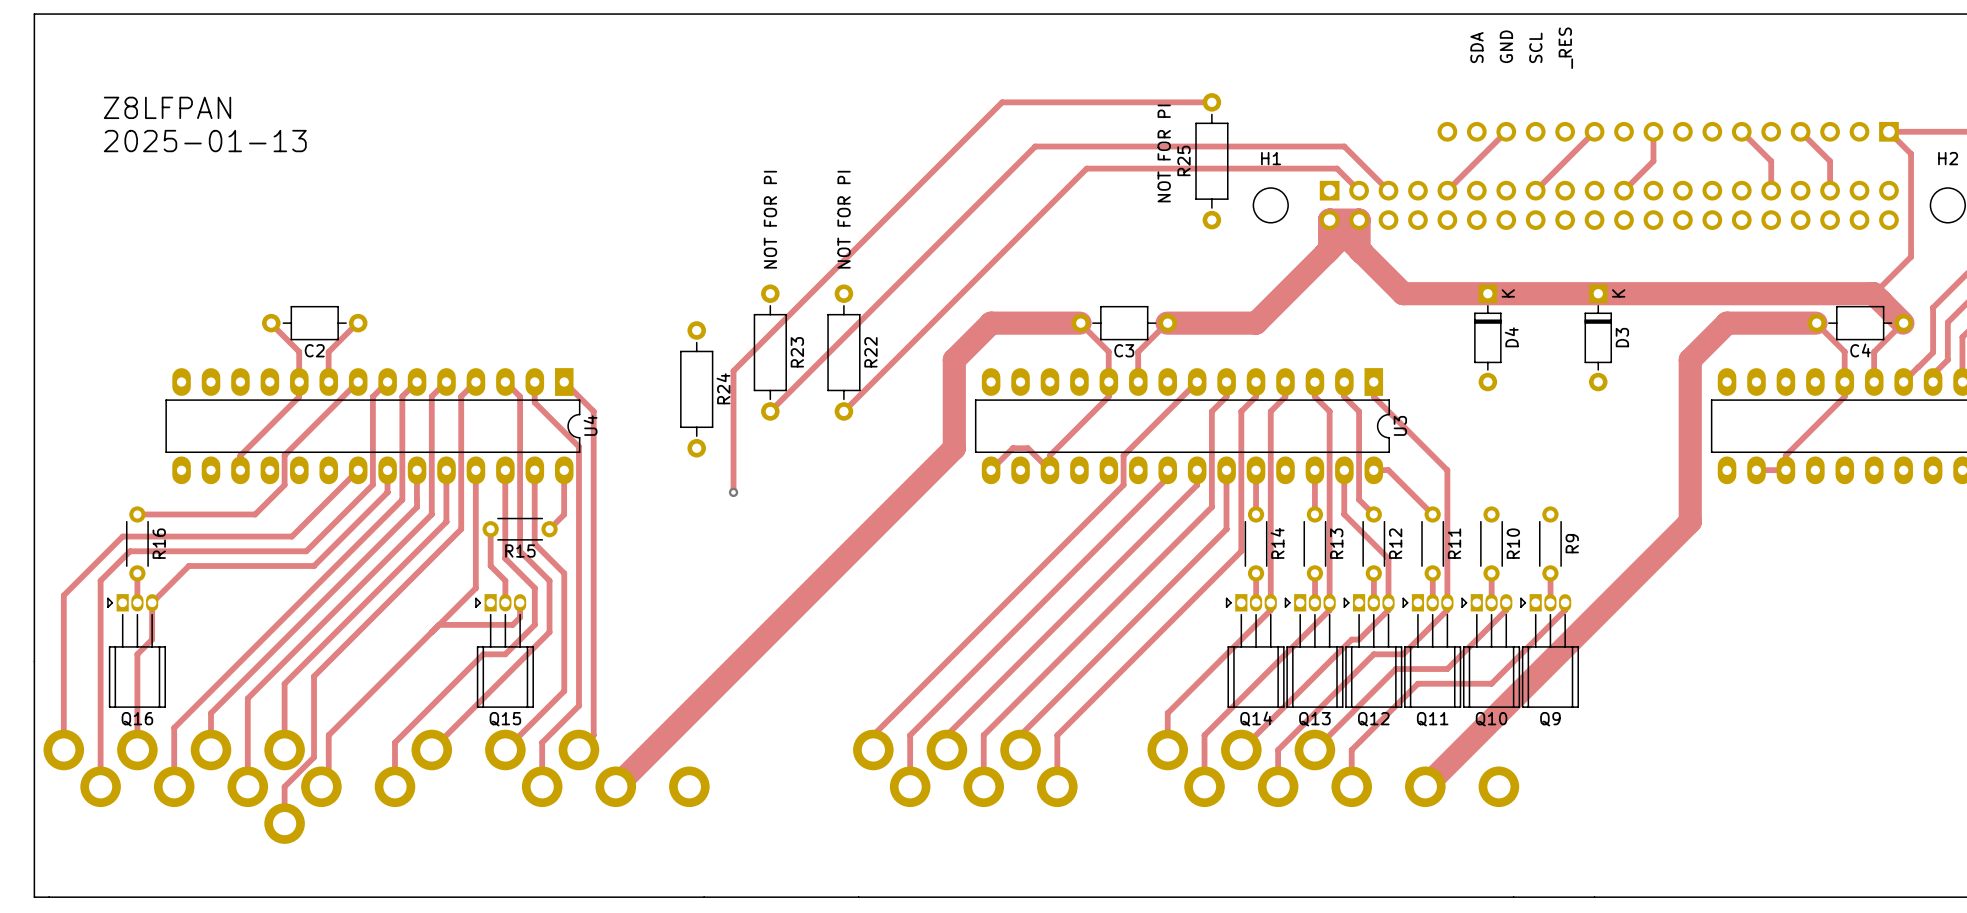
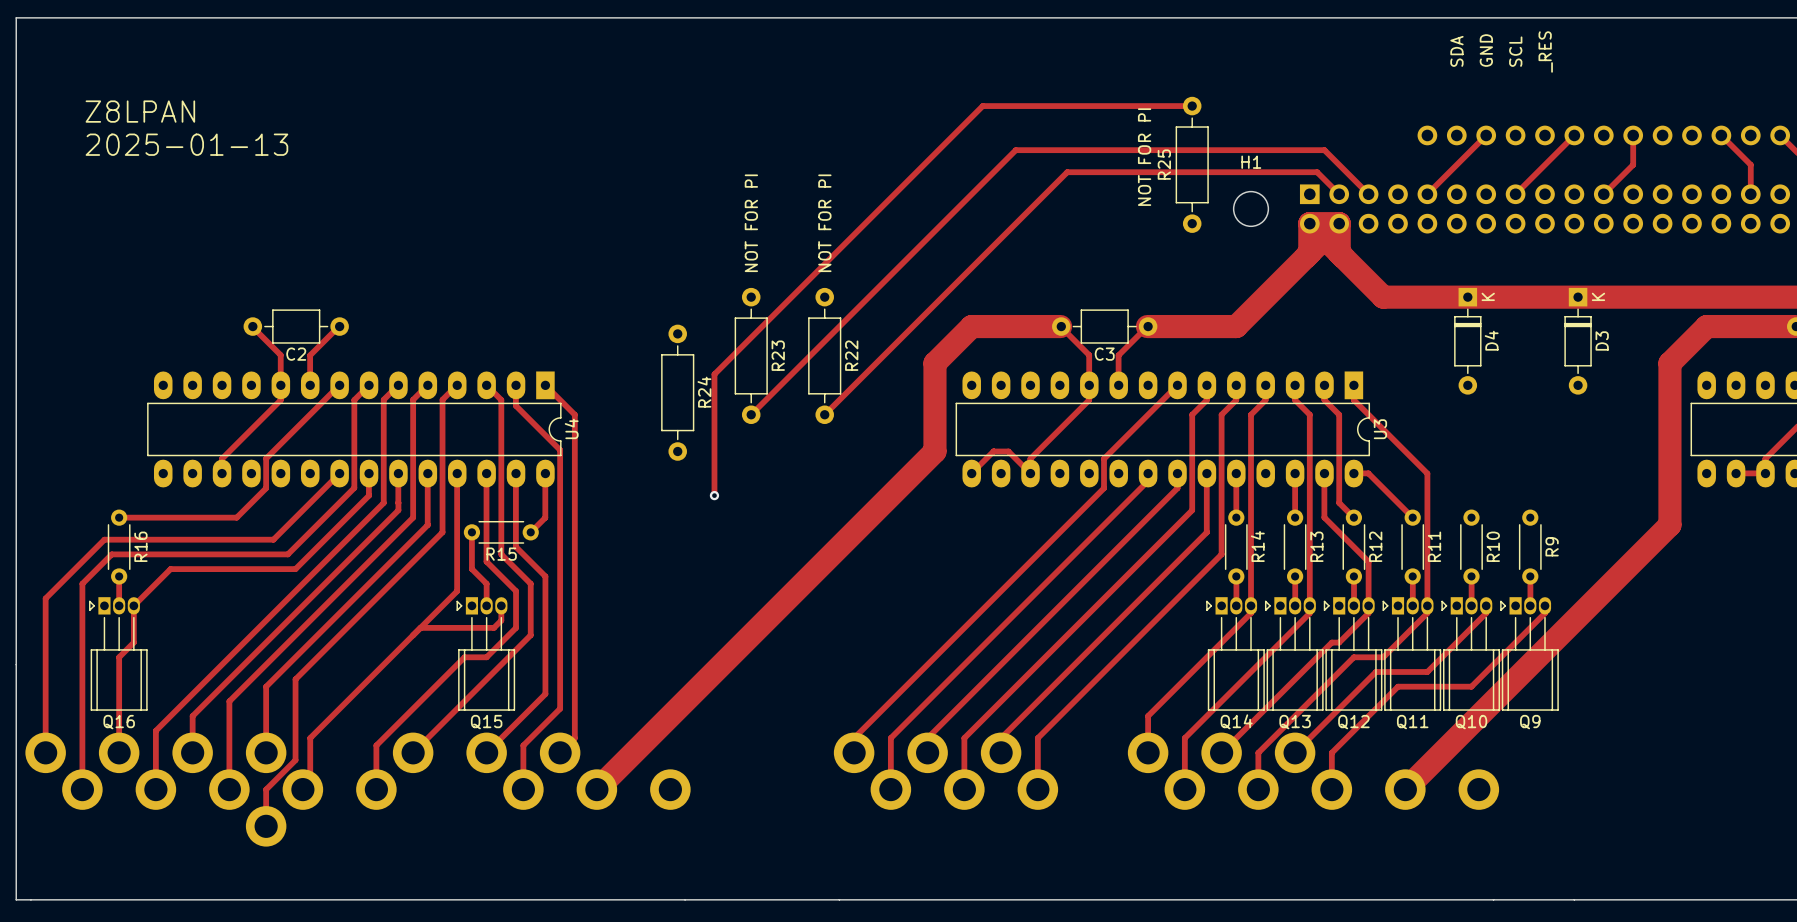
text: Z8LFPAN (167, 107) -> Z8LPAN (140, 111)

